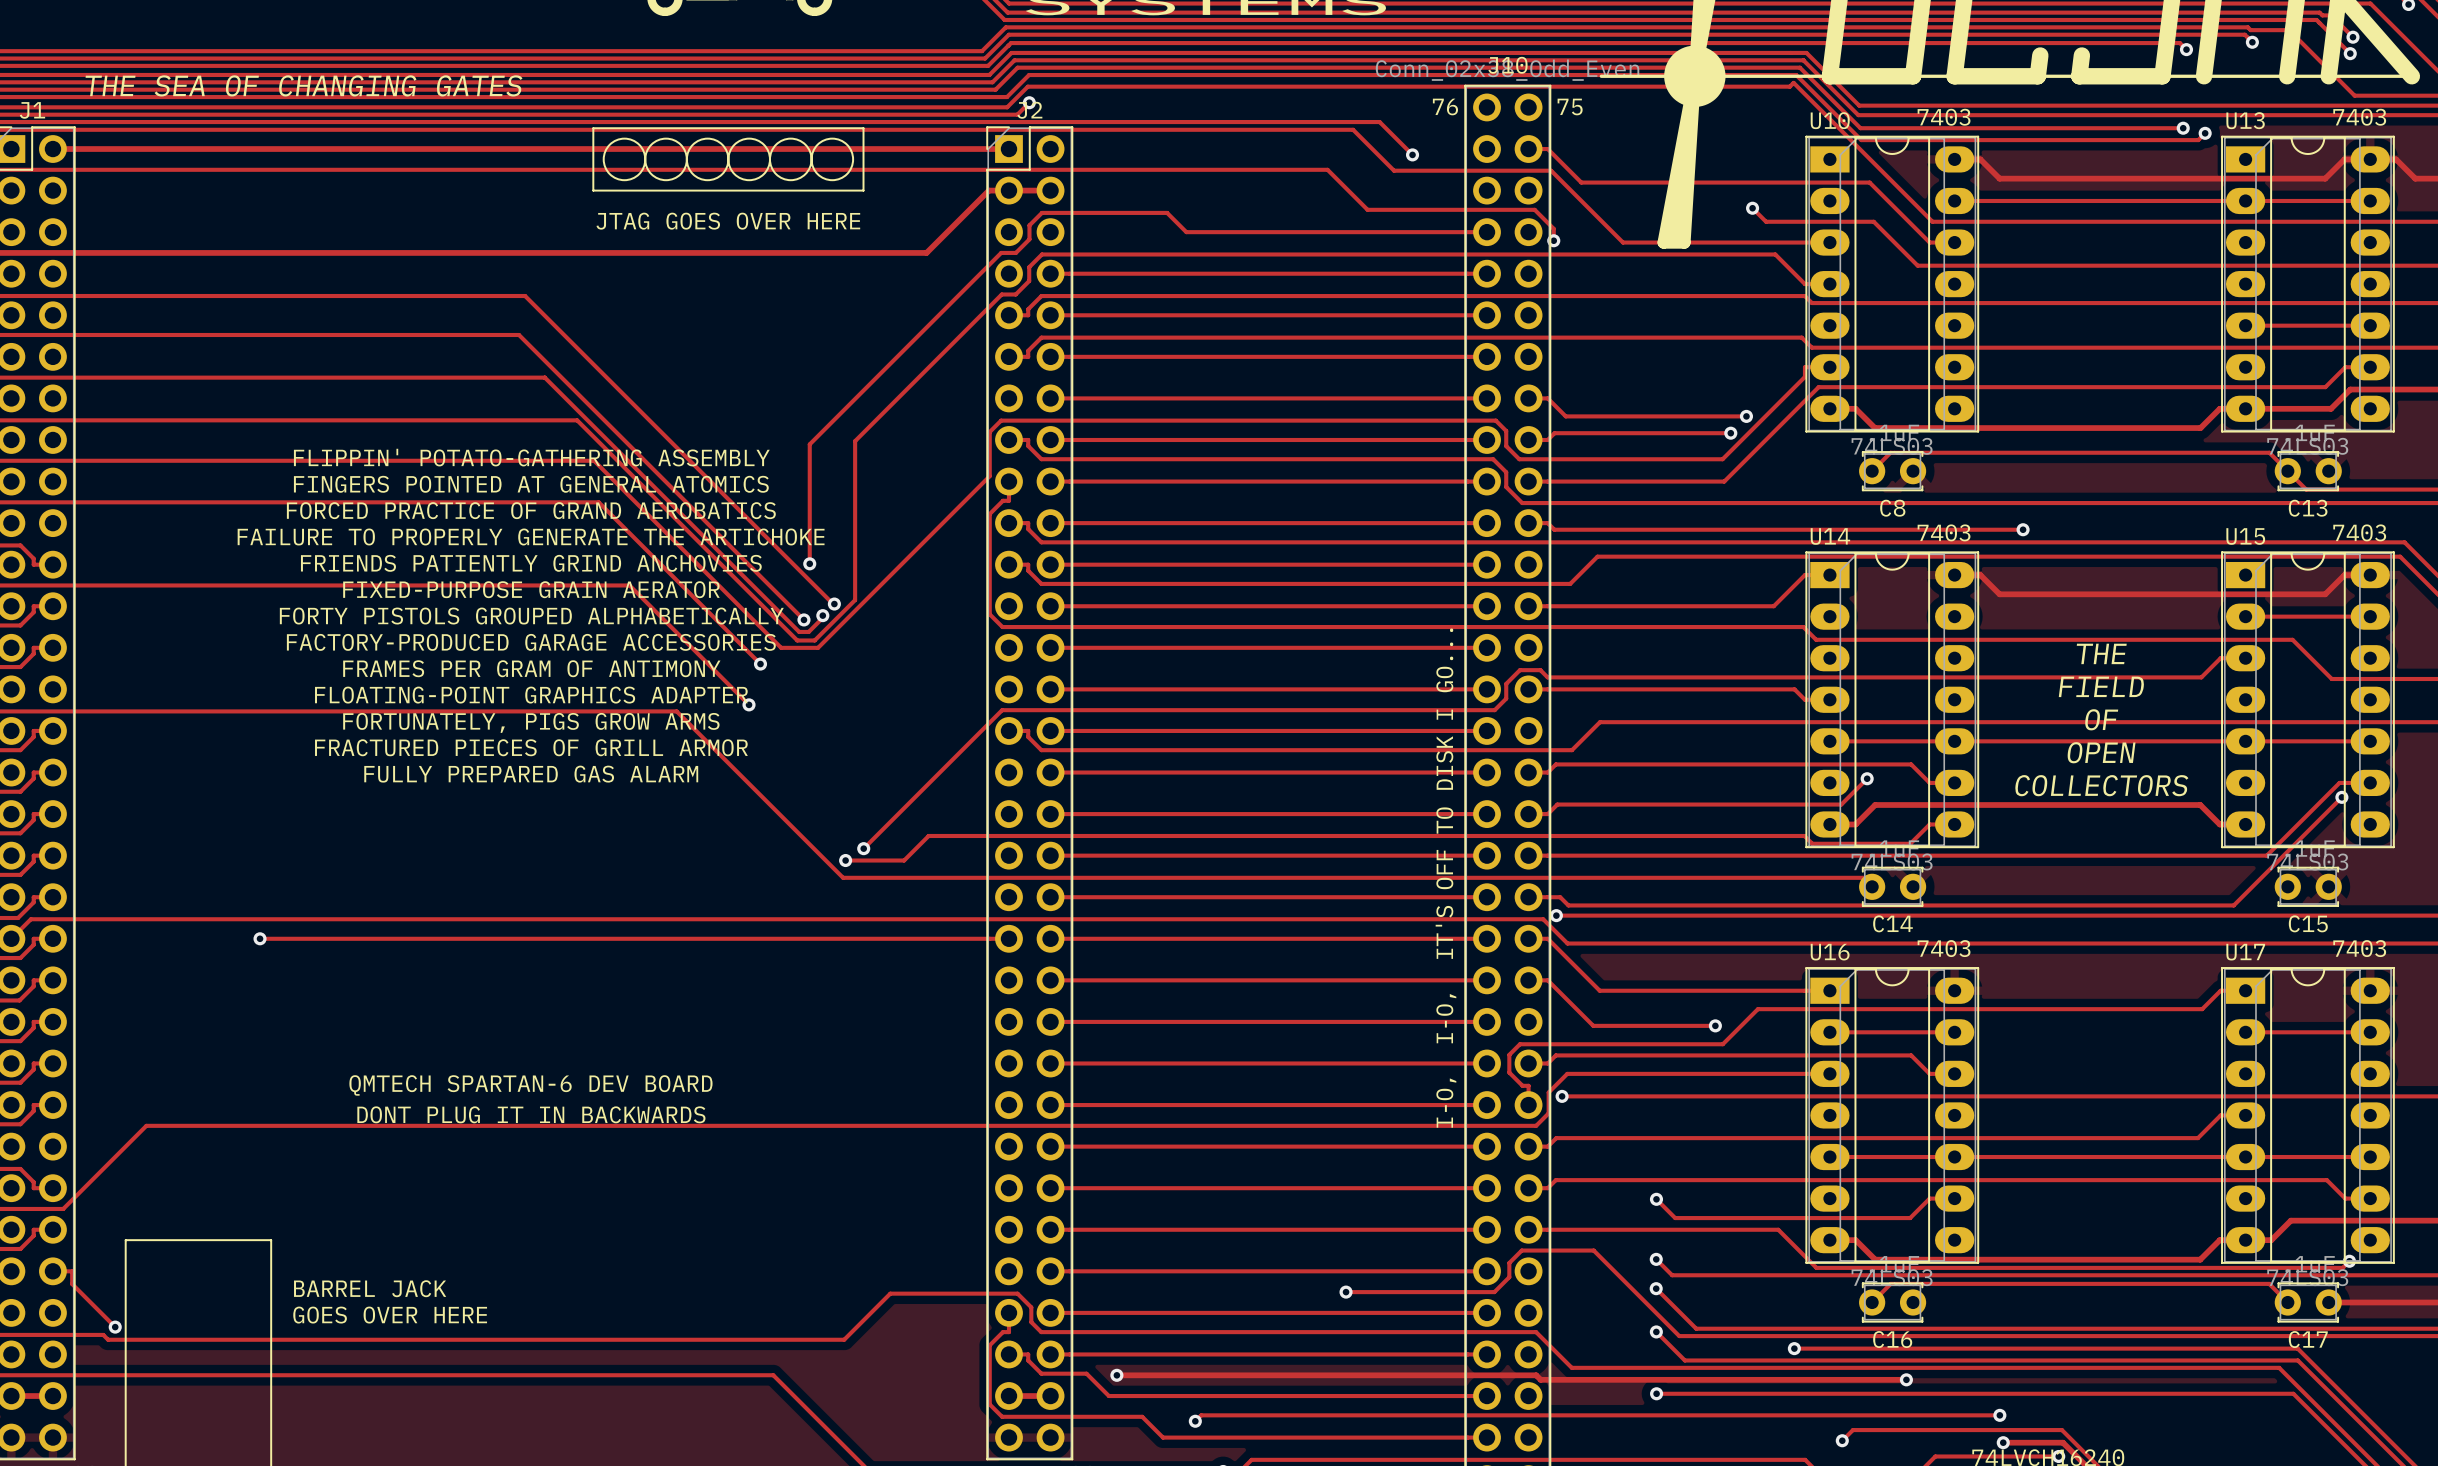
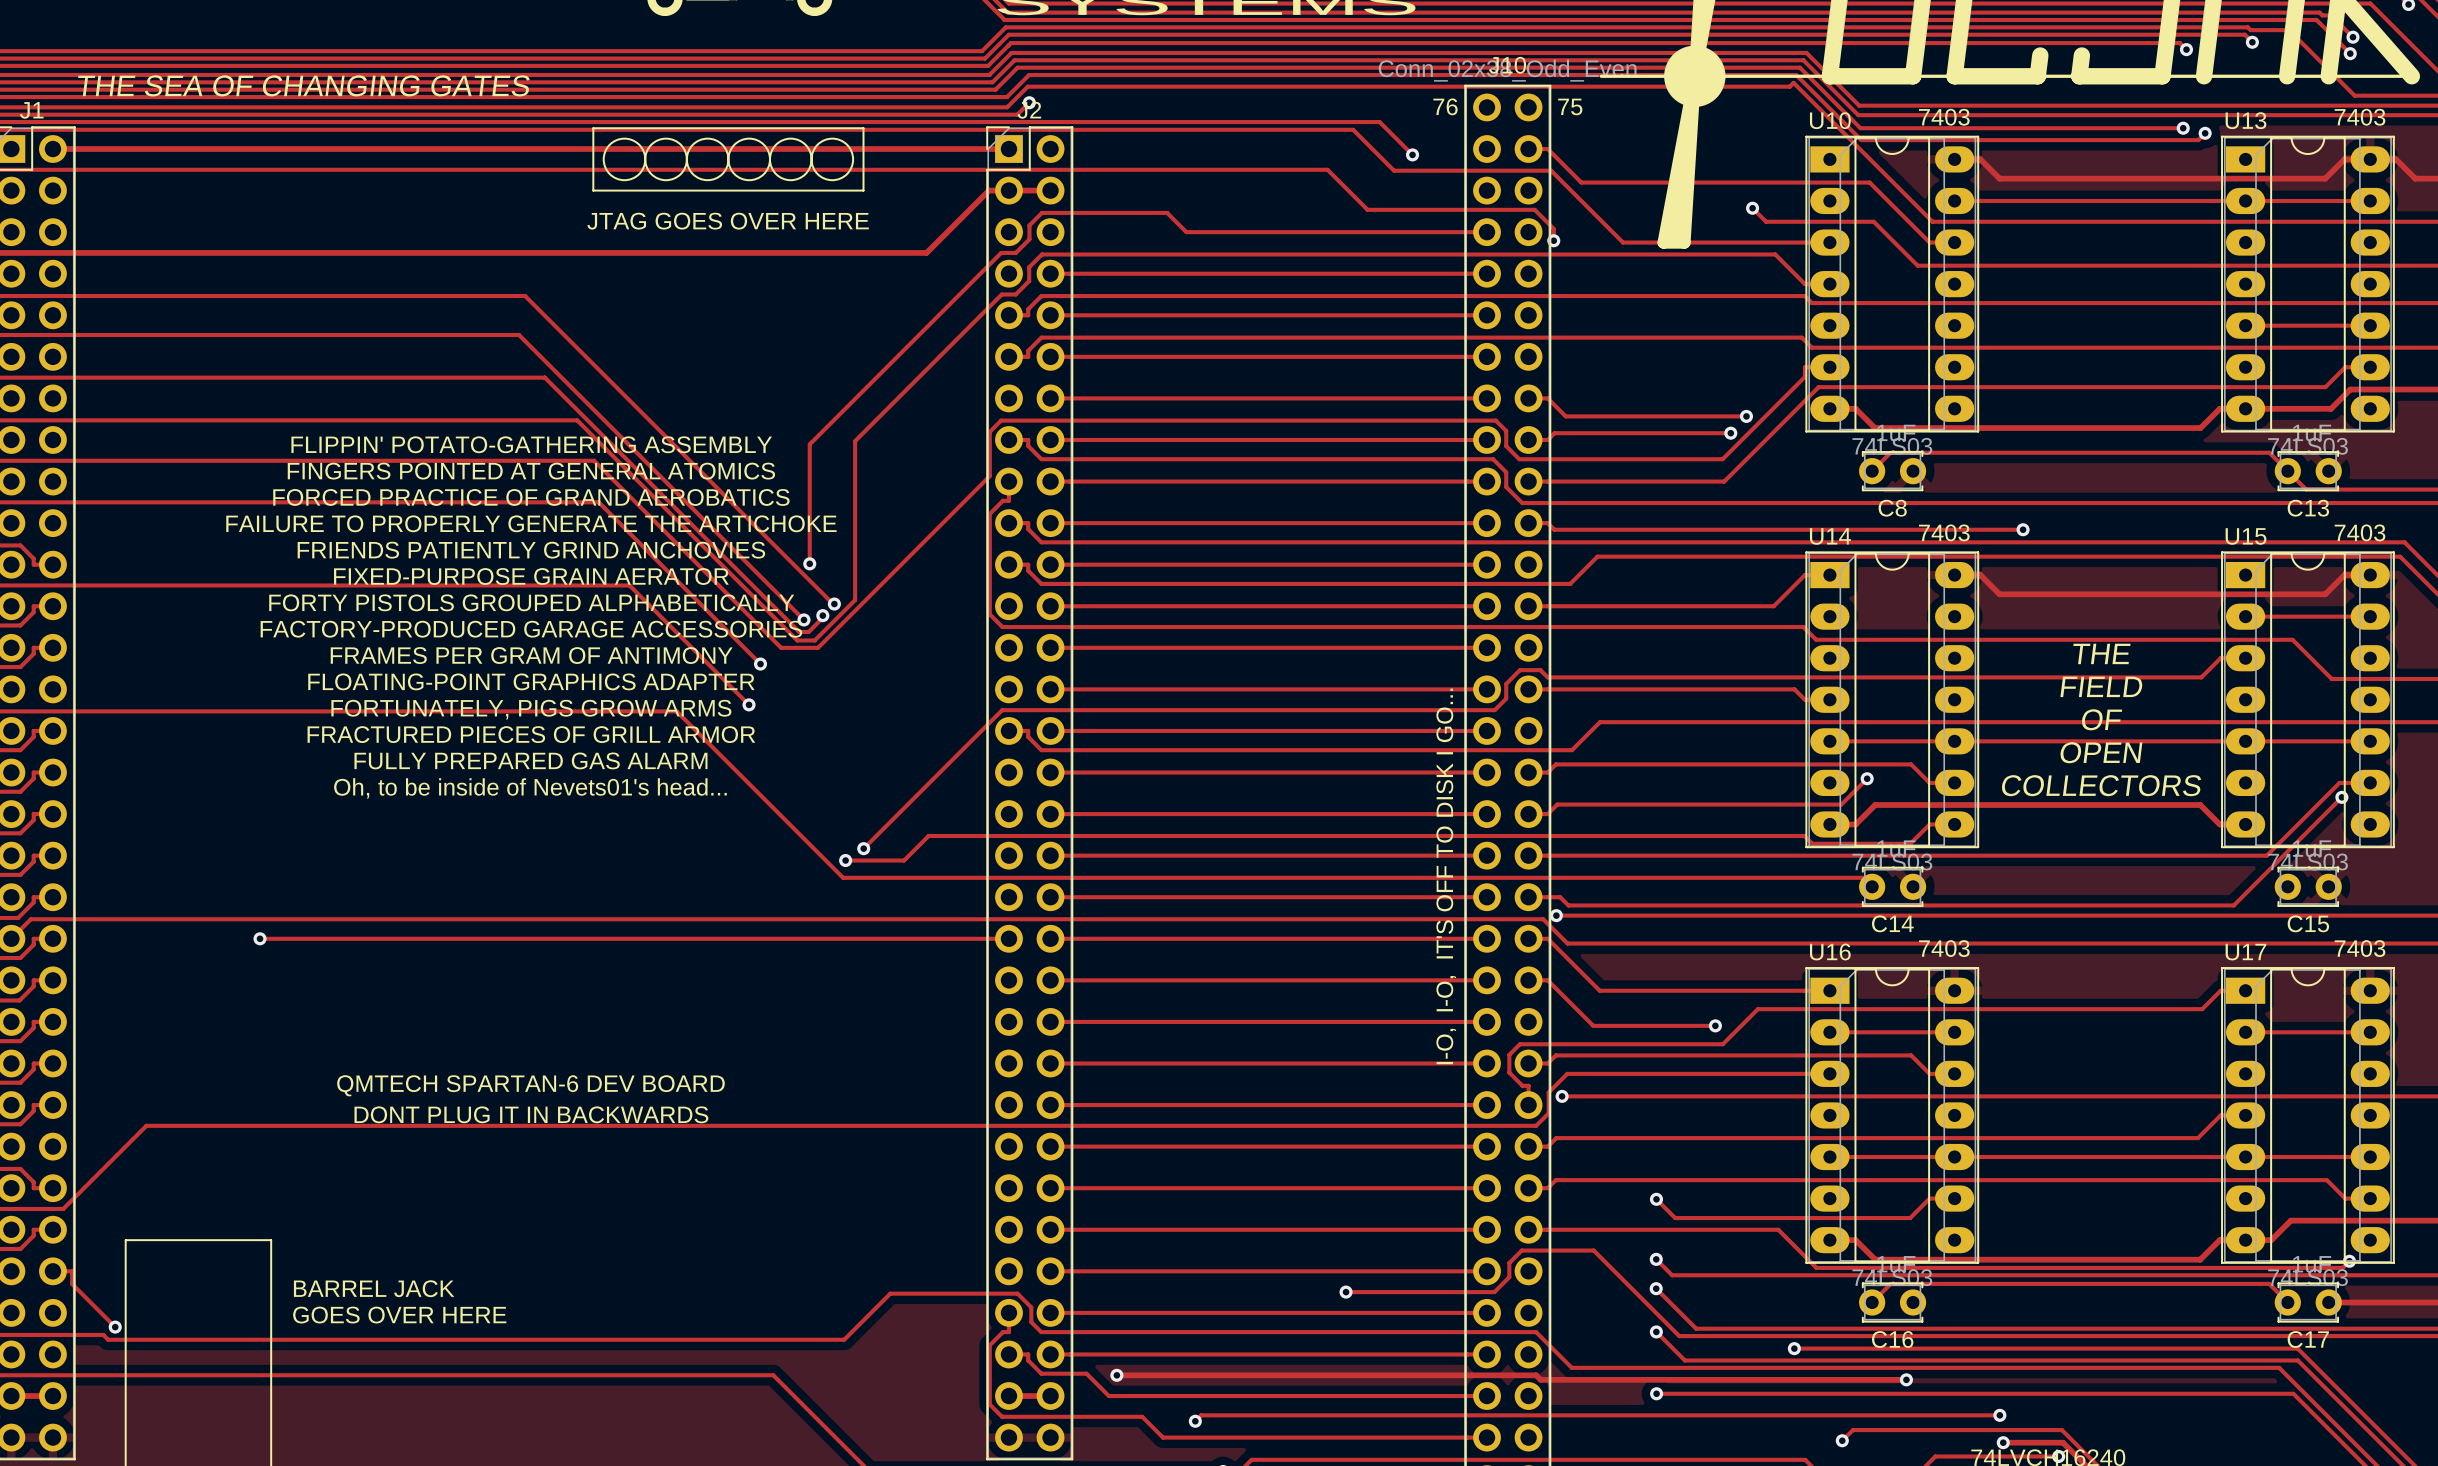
text position: FLIPPIN' POTATO-GATHERING ASSEMBLY (531, 457) -> FLIPPIN' POTATO-GATHERING ASSEMBLY (531, 444)
text position: FINGERS POINTED AT GENERAL ATOMICS (531, 484) -> FINGERS POINTED AT GENERAL ATOMICS (531, 471)
text position: FORCED PRACTICE OF GRAND AEROBATICS (531, 510) -> FORCED PRACTICE OF GRAND AEROBATICS (531, 497)
text position: FAILURE TO PROPERLY GENERATE THE ARTICHOKE (531, 536) -> FAILURE TO PROPERLY GENERATE THE ARTICHOKE (531, 523)
text position: FRIENDS PATIENTLY GRIND ANCHOVIES (531, 563) -> FRIENDS PATIENTLY GRIND ANCHOVIES (531, 550)
text position: FIXED-PURPOSE GRAIN AERATOR (531, 589) -> FIXED-PURPOSE GRAIN AERATOR (531, 576)
text position: FORTY PISTOLS GROUPED ALPHABETICALLY (531, 616) -> FORTY PISTOLS GROUPED ALPHABETICALLY (531, 602)
text position: FACTORY-PRODUCED GARAGE ACCESSORIES (531, 642) -> FACTORY-PRODUCED GARAGE ACCESSORIES (531, 629)
text position: FRAMES PER GRAM OF ANTIMONY (531, 668) -> FRAMES PER GRAM OF ANTIMONY (531, 655)
text position: FLOATING-POINT GRAPHICS ADAPTER (531, 695) -> FLOATING-POINT GRAPHICS ADAPTER (531, 681)
text position: FORTUNATELY, PIGS GROW ARMS (531, 722) -> FORTUNATELY, PIGS GROW ARMS (531, 709)
text position: FRACTURED PIECES OF GRILL ARMOR (531, 747) -> FRACTURED PIECES OF GRILL ARMOR (531, 734)
text position: FULLY PREPARED GAS ALARM (531, 774) -> FULLY PREPARED GAS ALARM (530, 760)
text: none -> Oh, to be inside of Nevets01's head... (530, 788)

